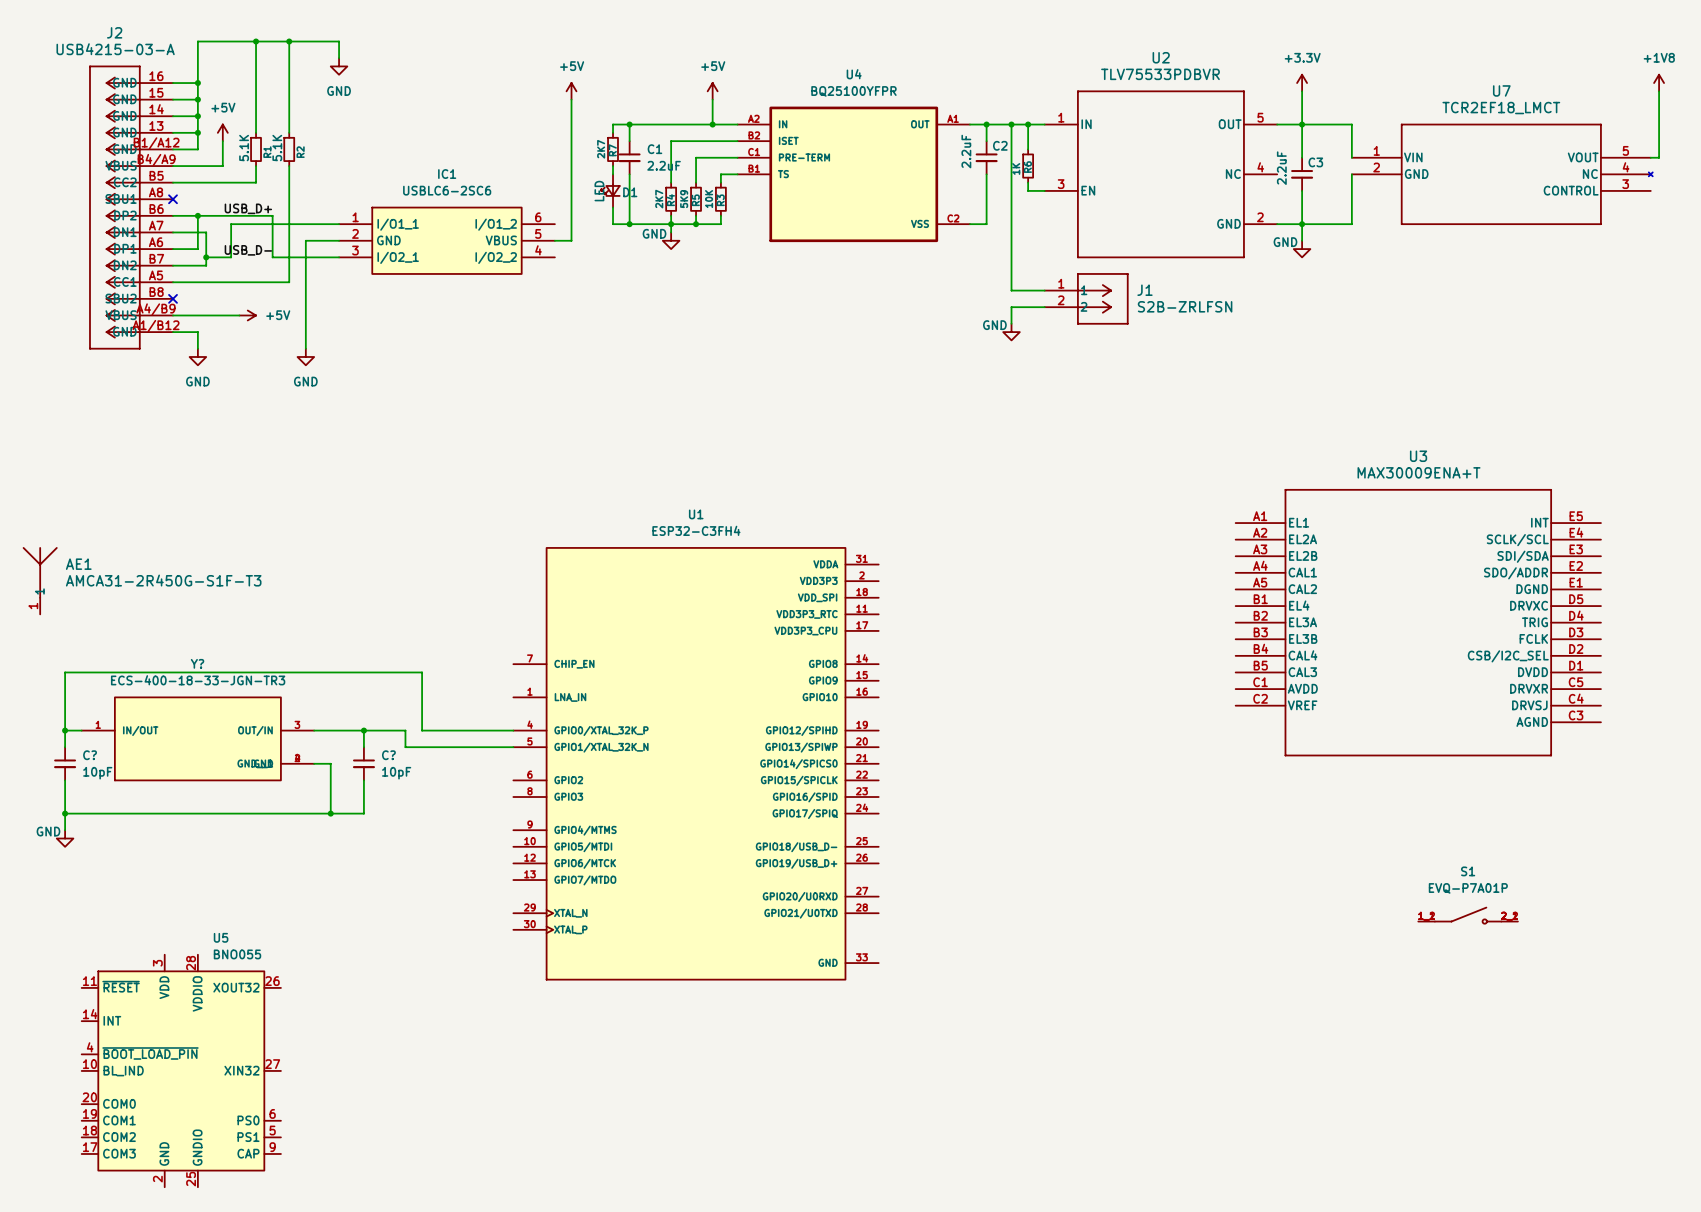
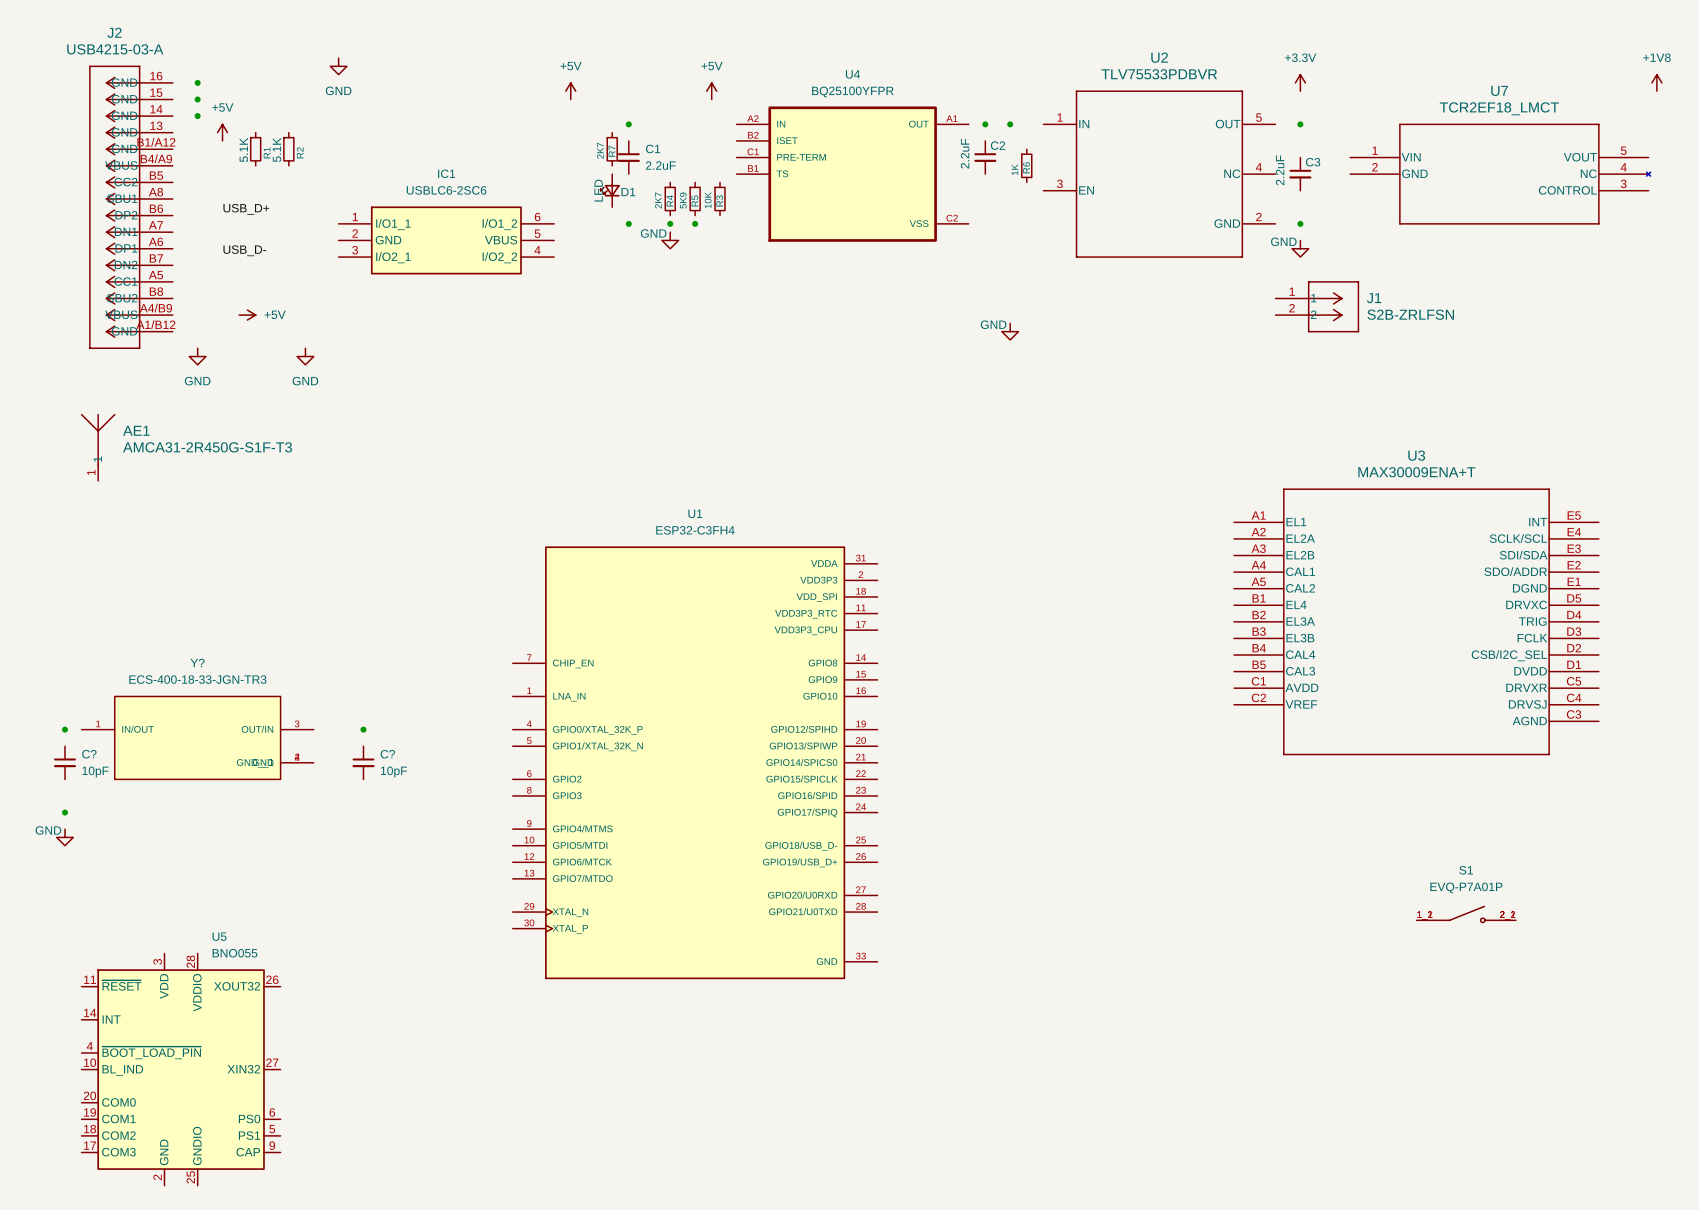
wire: (256, 41) (256, 132) -> none
junction: (256, 41) -> none
wire: (289, 41) (289, 132) -> none
junction: (289, 41) -> none
wire: (339, 58) (339, 41) (197, 41) (197, 149) (173, 149) -> none
wire: (173, 83) (197, 83) -> none
wire: (1302, 91) (1302, 157) -> none
wire: (1659, 91) (1659, 157) (1650, 157) -> none
wire: (173, 99) (197, 99) -> none
wire: (571, 99) (571, 240) (554, 240) -> none
wire: (712, 99) (712, 124) -> none
wire: (173, 116) (197, 116) -> none
wire: (629, 124) (629, 141) -> none
junction: (712, 124) -> none
wire: (737, 124) (613, 124) (613, 132) -> none
wire: (970, 124) (1044, 124) -> none
wire: (986, 124) (986, 141) -> none
wire: (1011, 124) (1011, 290) (1044, 290) -> none
wire: (1028, 124) (1028, 149) -> none
junction: (1028, 124) -> none
wire: (1277, 124) (1351, 124) (1351, 157) -> none
wire: (173, 132) (197, 132) -> none
junction: (197, 132) -> none
wire: (222, 141) (222, 166) (173, 166) -> none
wire: (737, 141) (671, 141) (671, 182) -> none
wire: (737, 157) (696, 157) (696, 182) -> none
wire: (256, 166) (256, 182) (173, 182) -> none
wire: (289, 166) (289, 282) (173, 282) -> none
wire: (613, 166) (613, 174) -> none
wire: (629, 174) (629, 224) -> none
wire: (737, 174) (720, 174) (720, 182) -> none
wire: (986, 174) (986, 224) (970, 224) -> none
wire: (1351, 174) (1351, 224) (1277, 224) -> none
wire: (1028, 182) (1028, 190) (1044, 190) -> none
wire: (1302, 190) (1302, 240) -> none
no-connect mark: (173, 199) -> none
wire: (613, 207) (613, 224) (720, 224) (720, 215) -> none
wire: (173, 215) (272, 215) (272, 257) (339, 257) -> none
wire: (197, 215) (197, 249) (173, 249) -> none
junction: (197, 215) -> none
wire: (671, 215) (671, 232) -> none
wire: (696, 215) (696, 224) -> none
wire: (339, 224) (231, 224) (231, 257) (206, 257) -> none
wire: (173, 232) (206, 232) (206, 265) (173, 265) -> none
wire: (339, 240) (305, 240) (305, 348) -> none
junction: (206, 257) -> none
no-connect mark: (173, 298) -> none
J1 position: (1086, 298) -> (1317, 306)
wire: (1044, 307) (1011, 307) (1011, 323) -> none
wire: (173, 315) (239, 315) -> none
wire: (173, 332) (197, 332) (197, 348) -> none
AE1 position: (40, 580) -> (98, 447)
wire: (65, 730) (81, 730) -> none
wire: (314, 730) (405, 730) (405, 747) (513, 747) -> none
wire: (363, 730) (363, 747) -> none
wire: (513, 730) (422, 730) (422, 672) (65, 672) (65, 747) -> none
wire: (314, 763) (330, 763) (330, 813) -> none
wire: (65, 780) (65, 830) -> none
wire: (363, 780) (363, 813) (65, 813) -> none
junction: (330, 813) -> none

